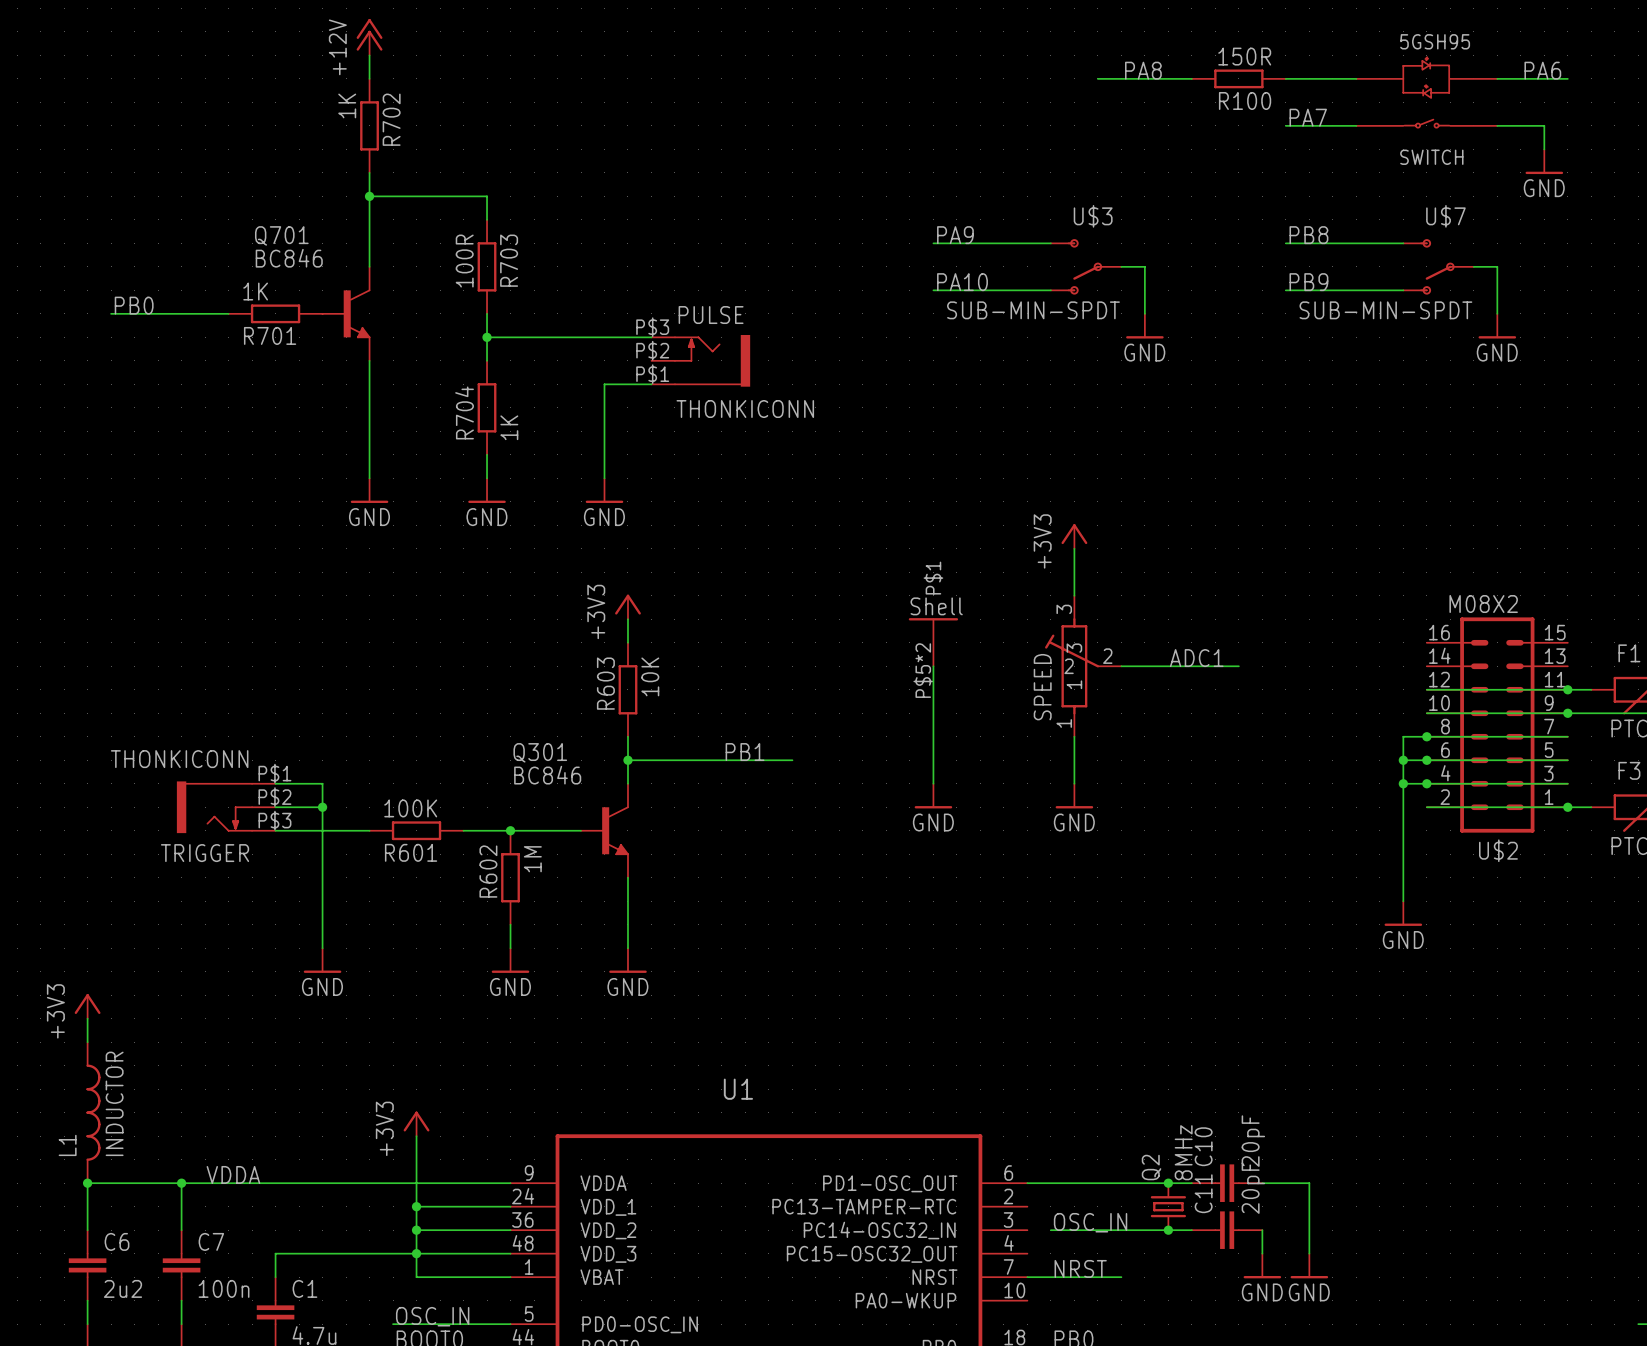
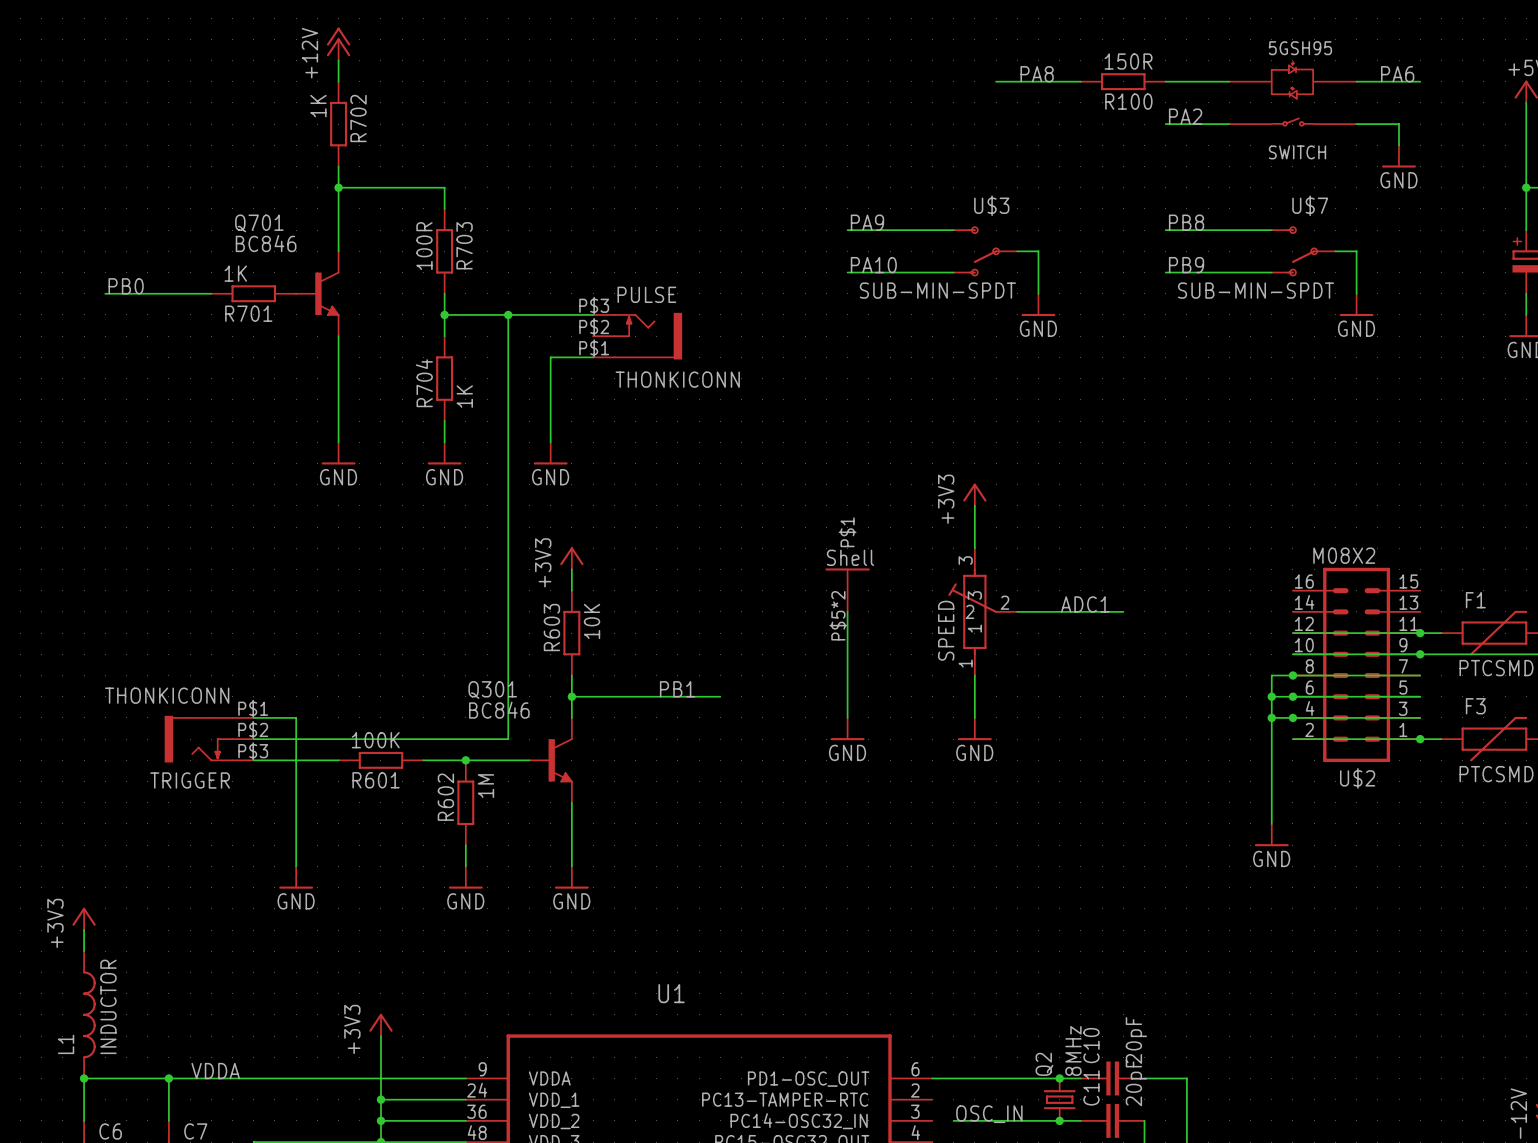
label: PA7 (1308, 117) -> PA2 (1185, 116)
wire: none -> (508, 314) (508, 739) (296, 739)
junction: none -> (508, 314)
junction: (322, 807) -> none

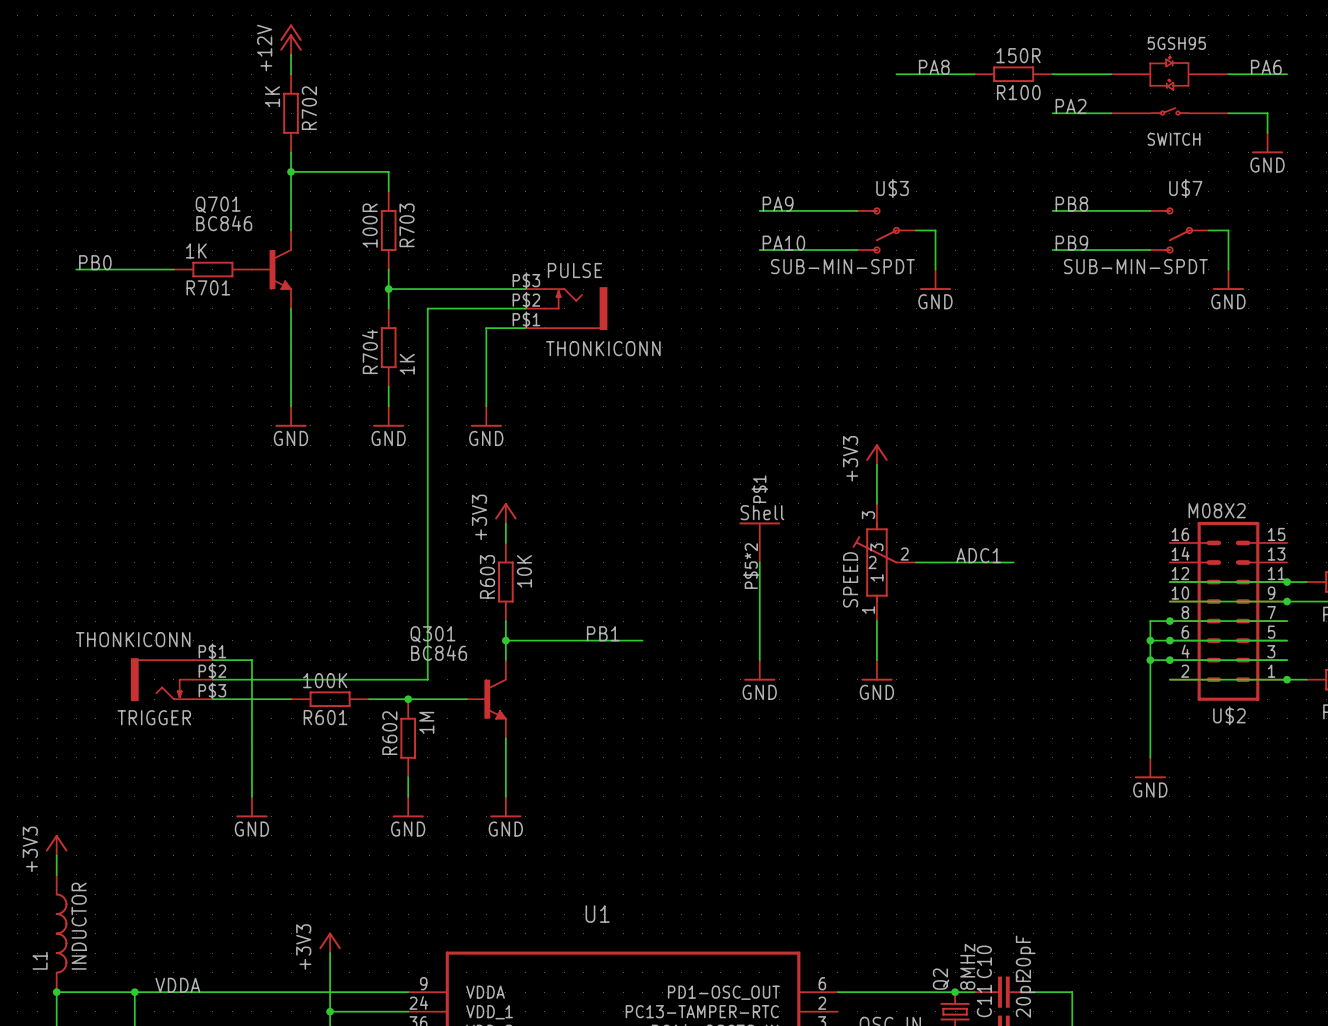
wire: (508, 314) (508, 739) (487, 739) -> (525, 308) (427, 308) (427, 679)
junction: (508, 314) -> none

